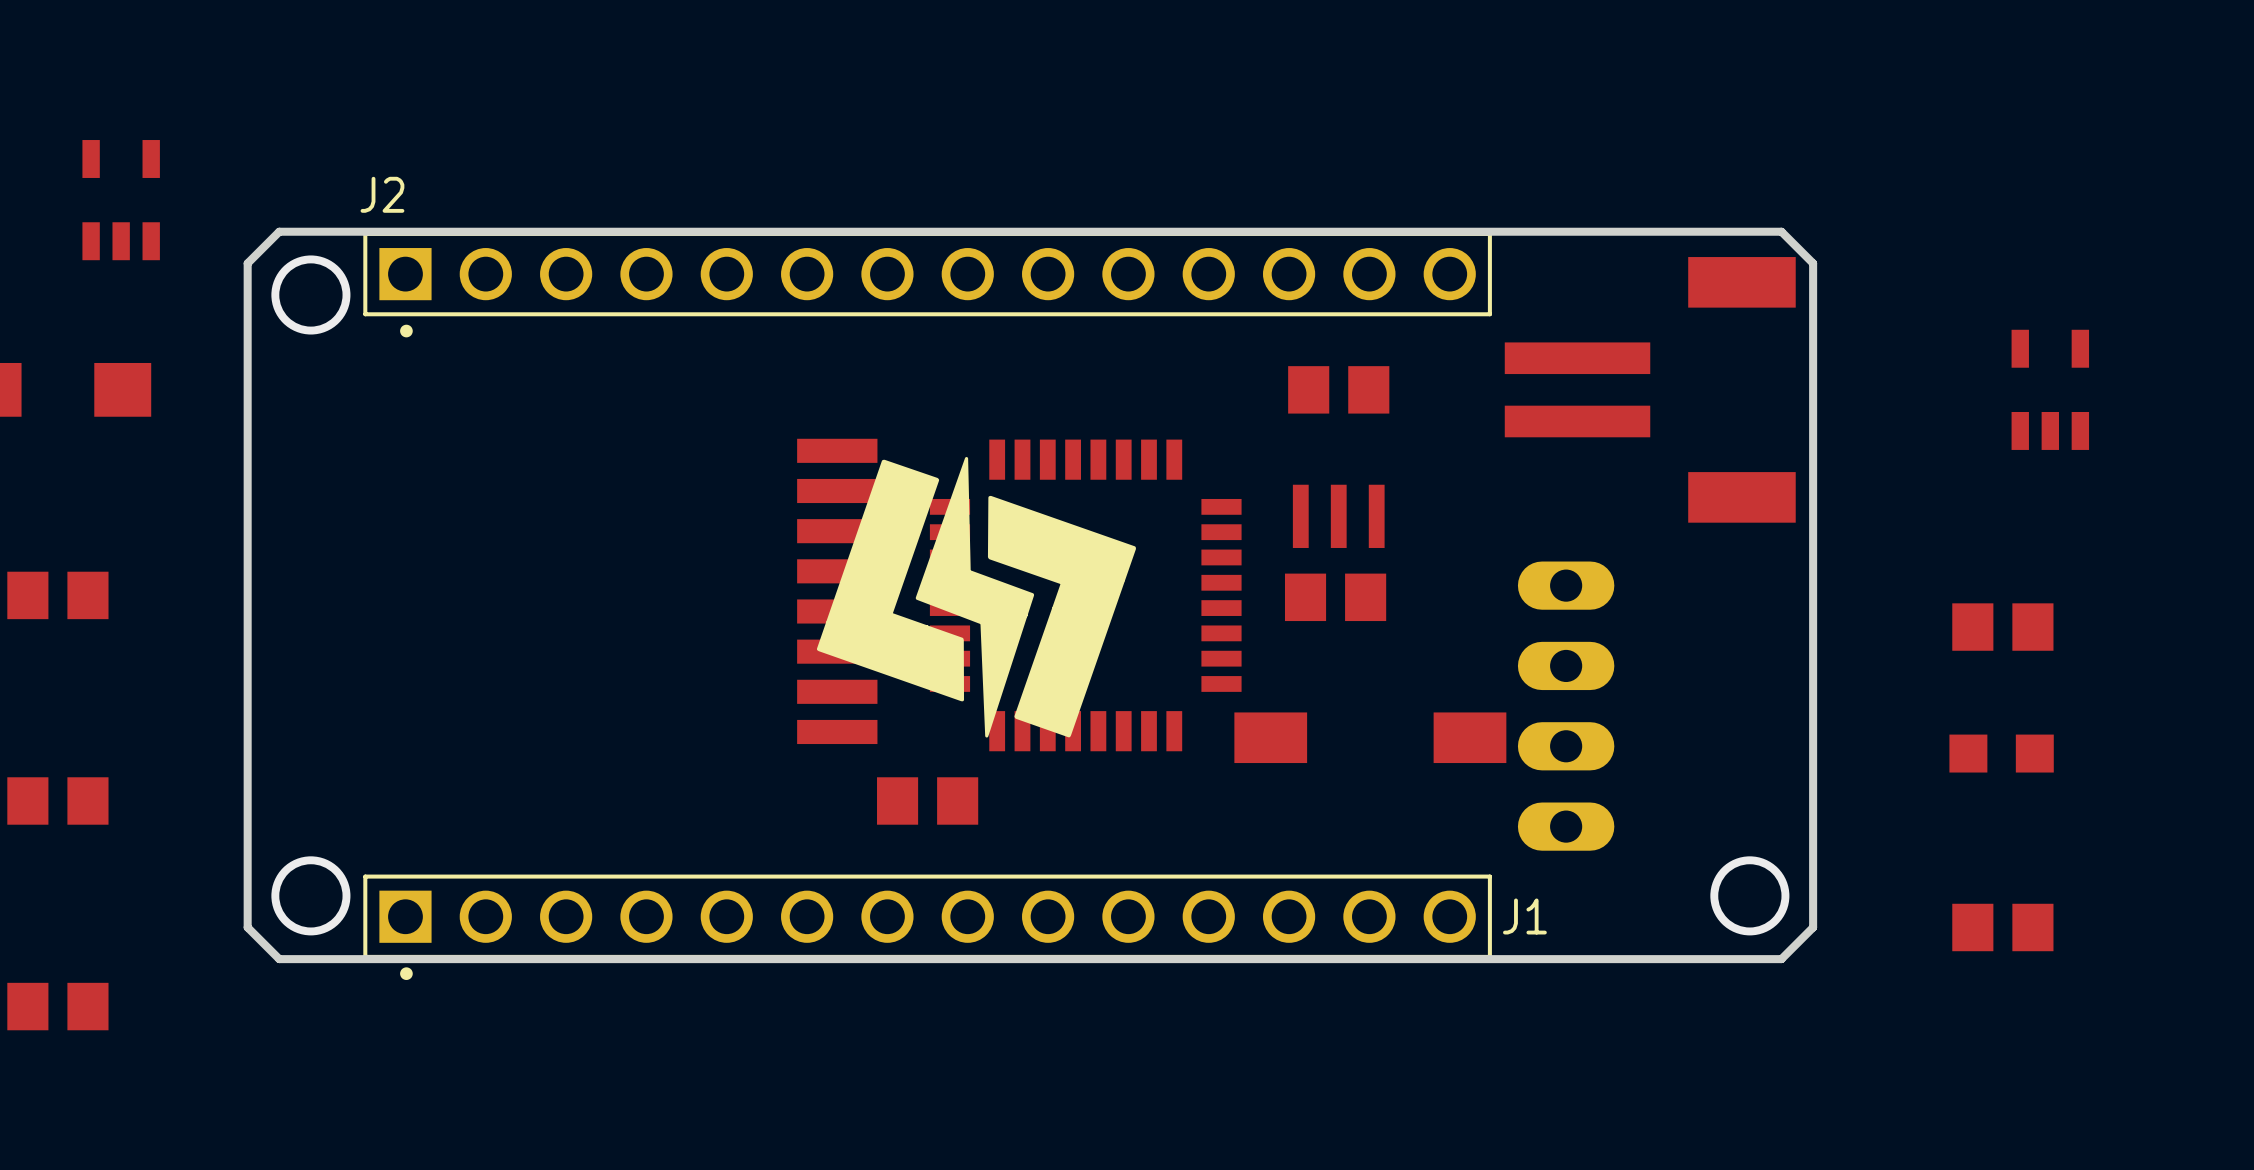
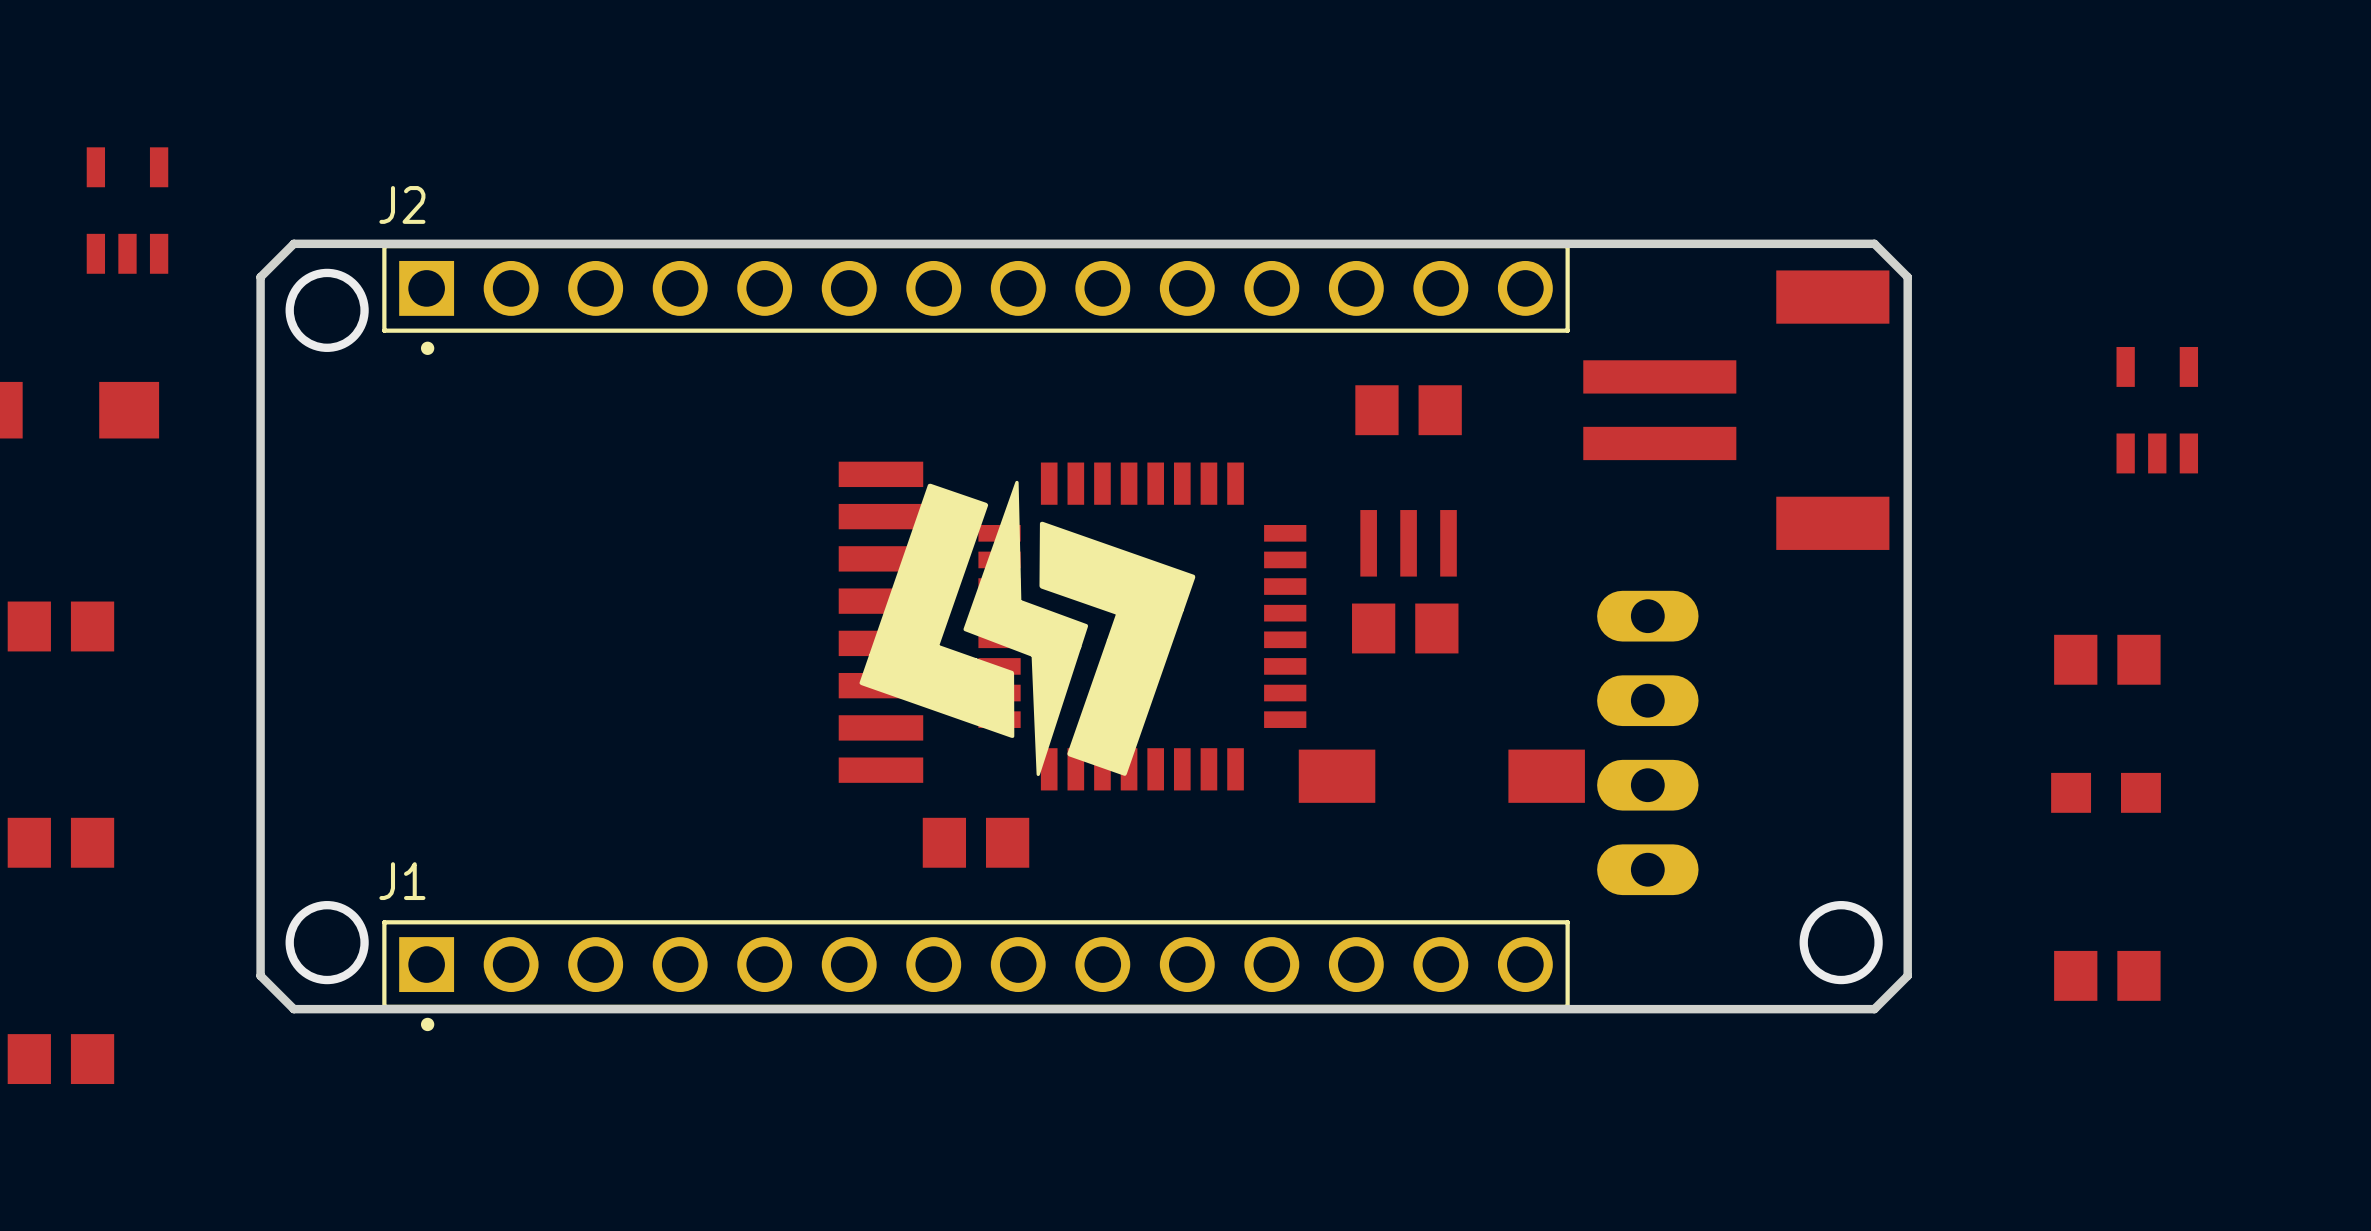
J1 name position: J1 (1524, 916) -> J1 (402, 881)

